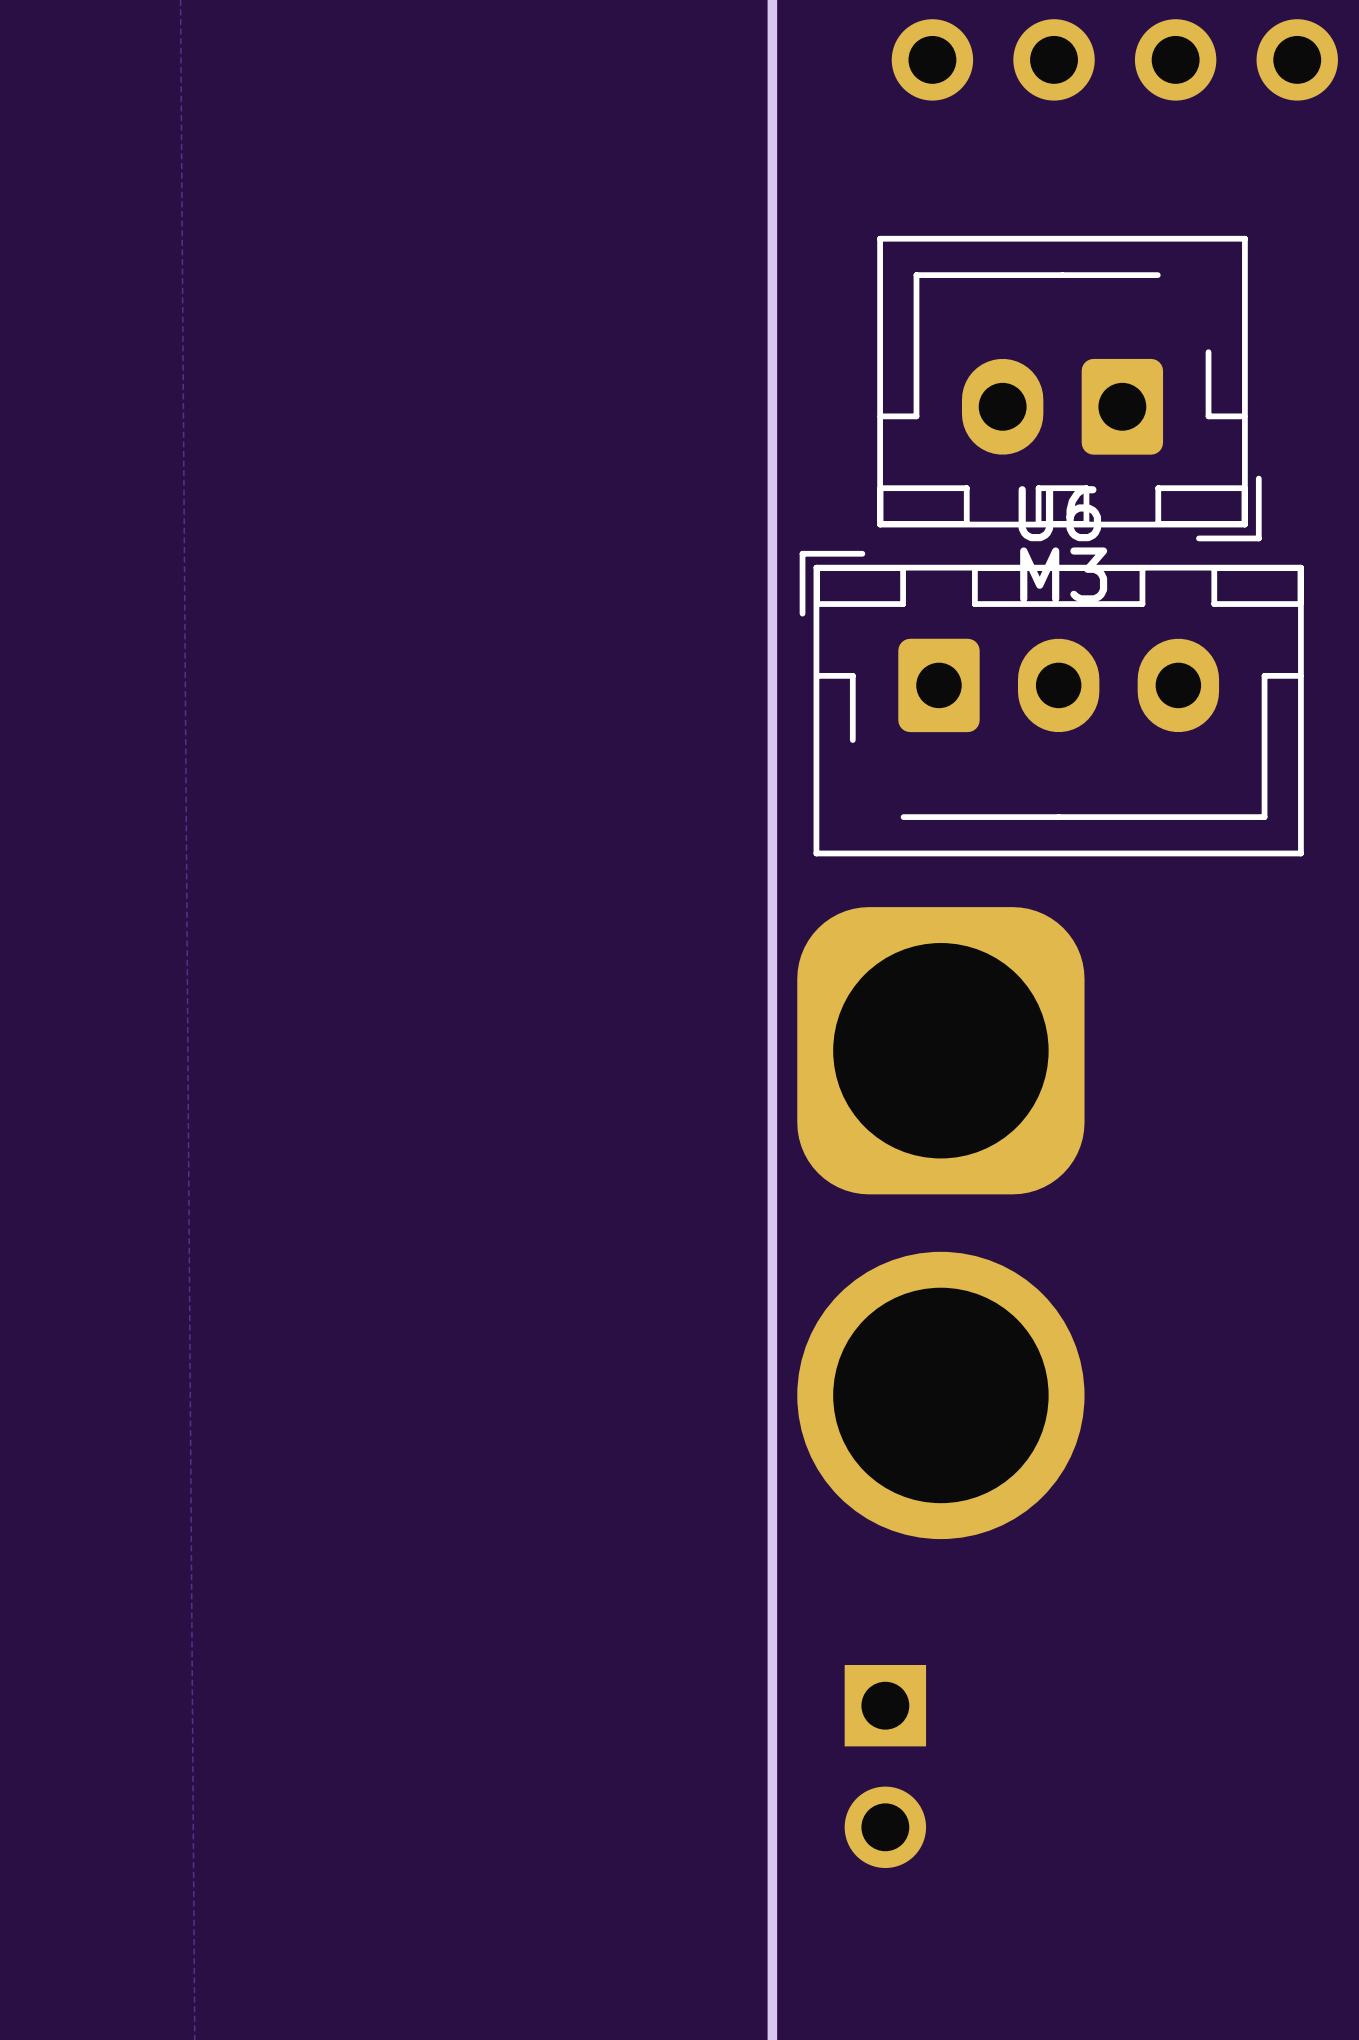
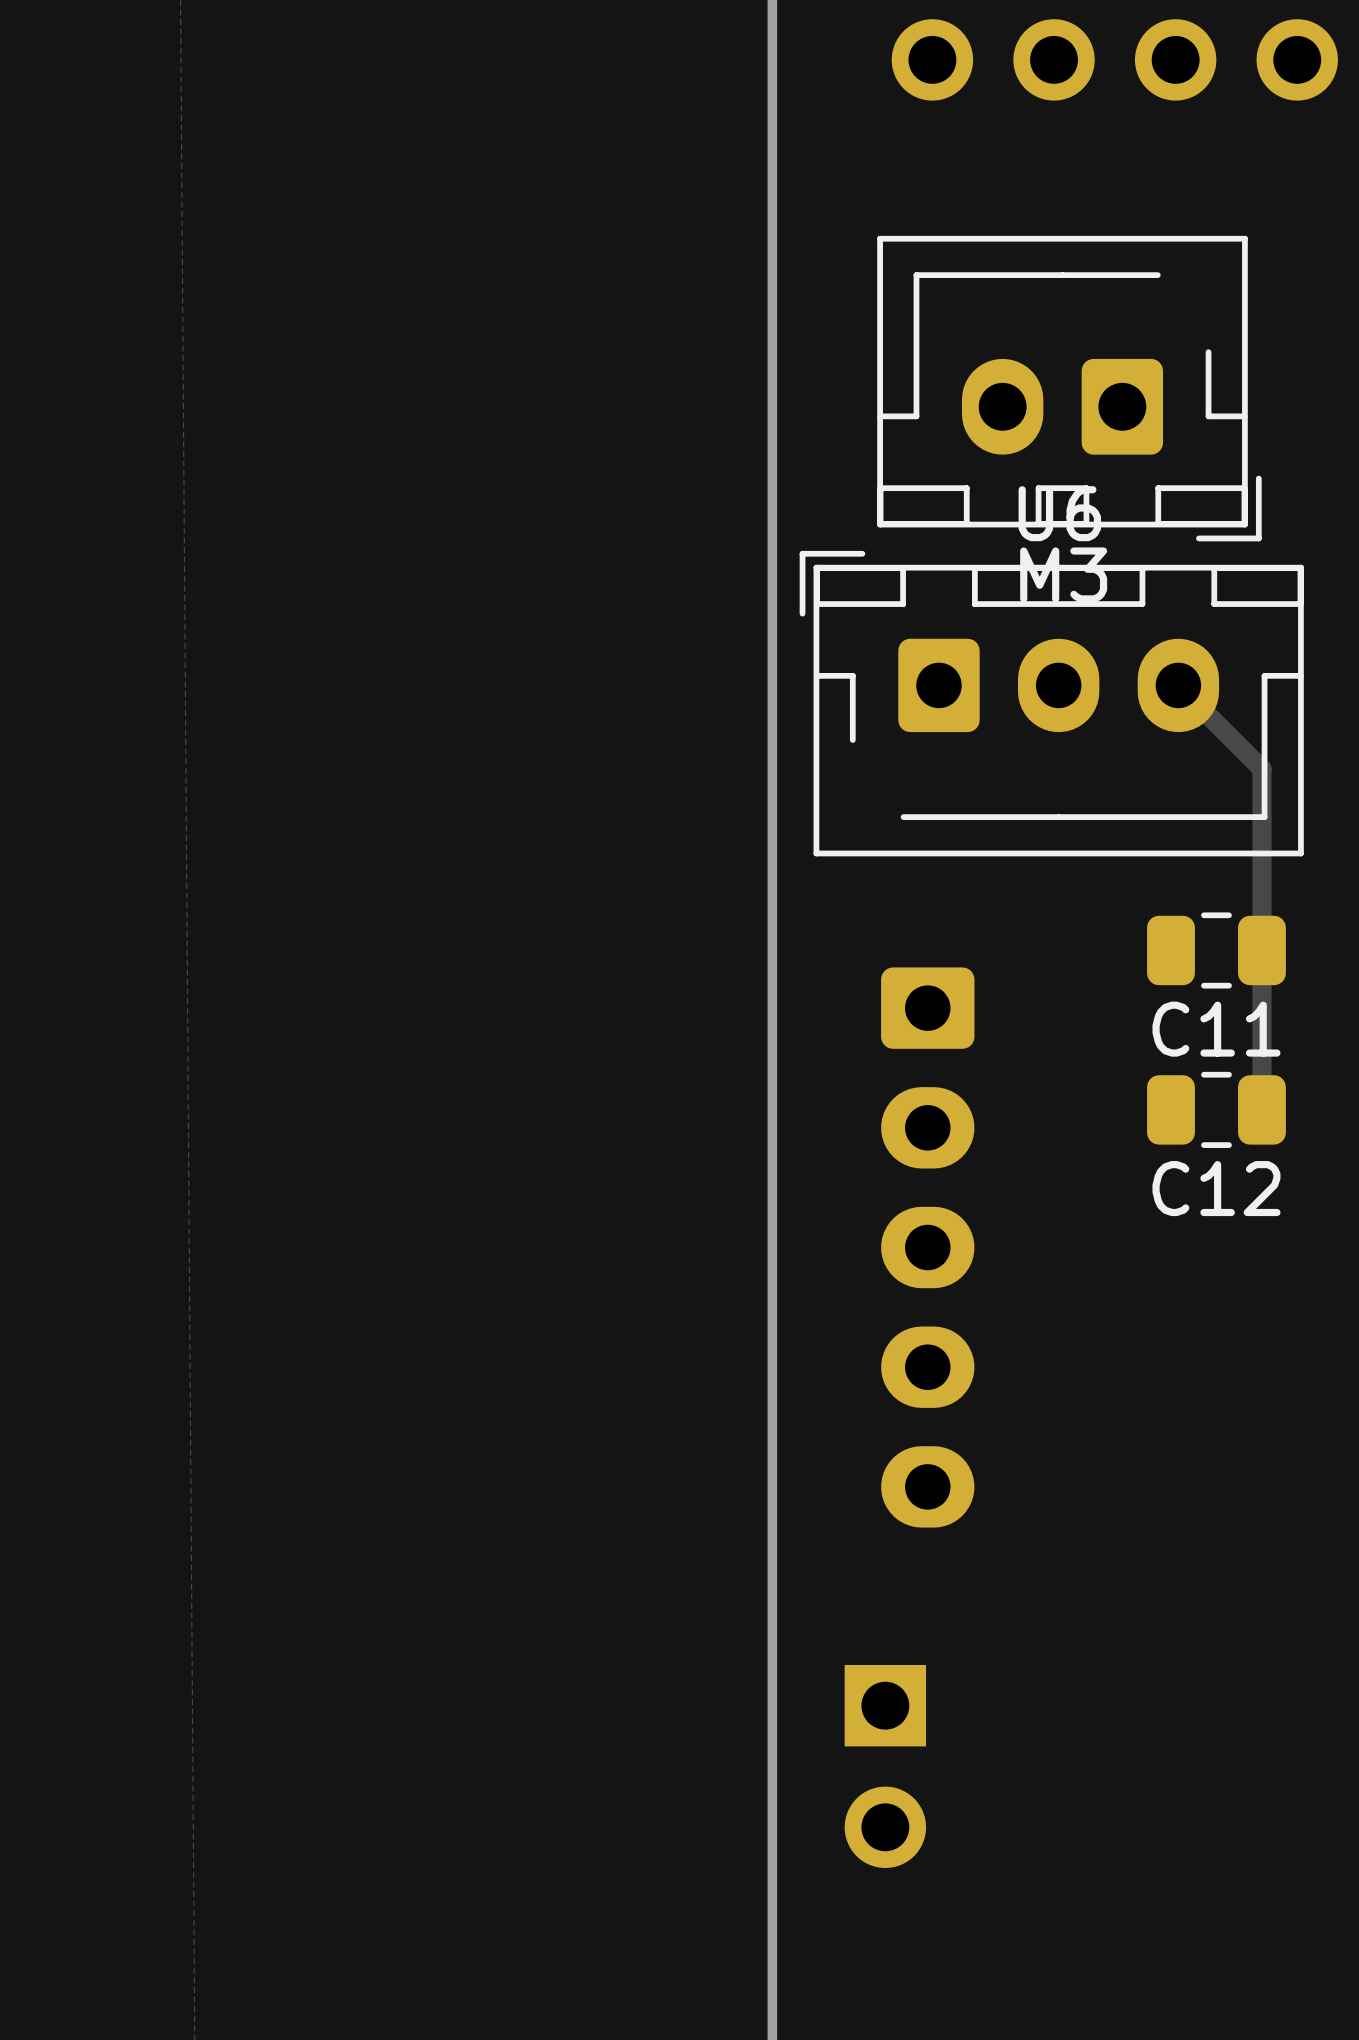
track: none -> (1178, 685) (1261, 769) (1261, 1109)
part footprint: [797, 907, 1085, 1540] -> [881, 967, 975, 1528]
C11: none -> (1216, 950)
C12: none -> (1216, 1109)

